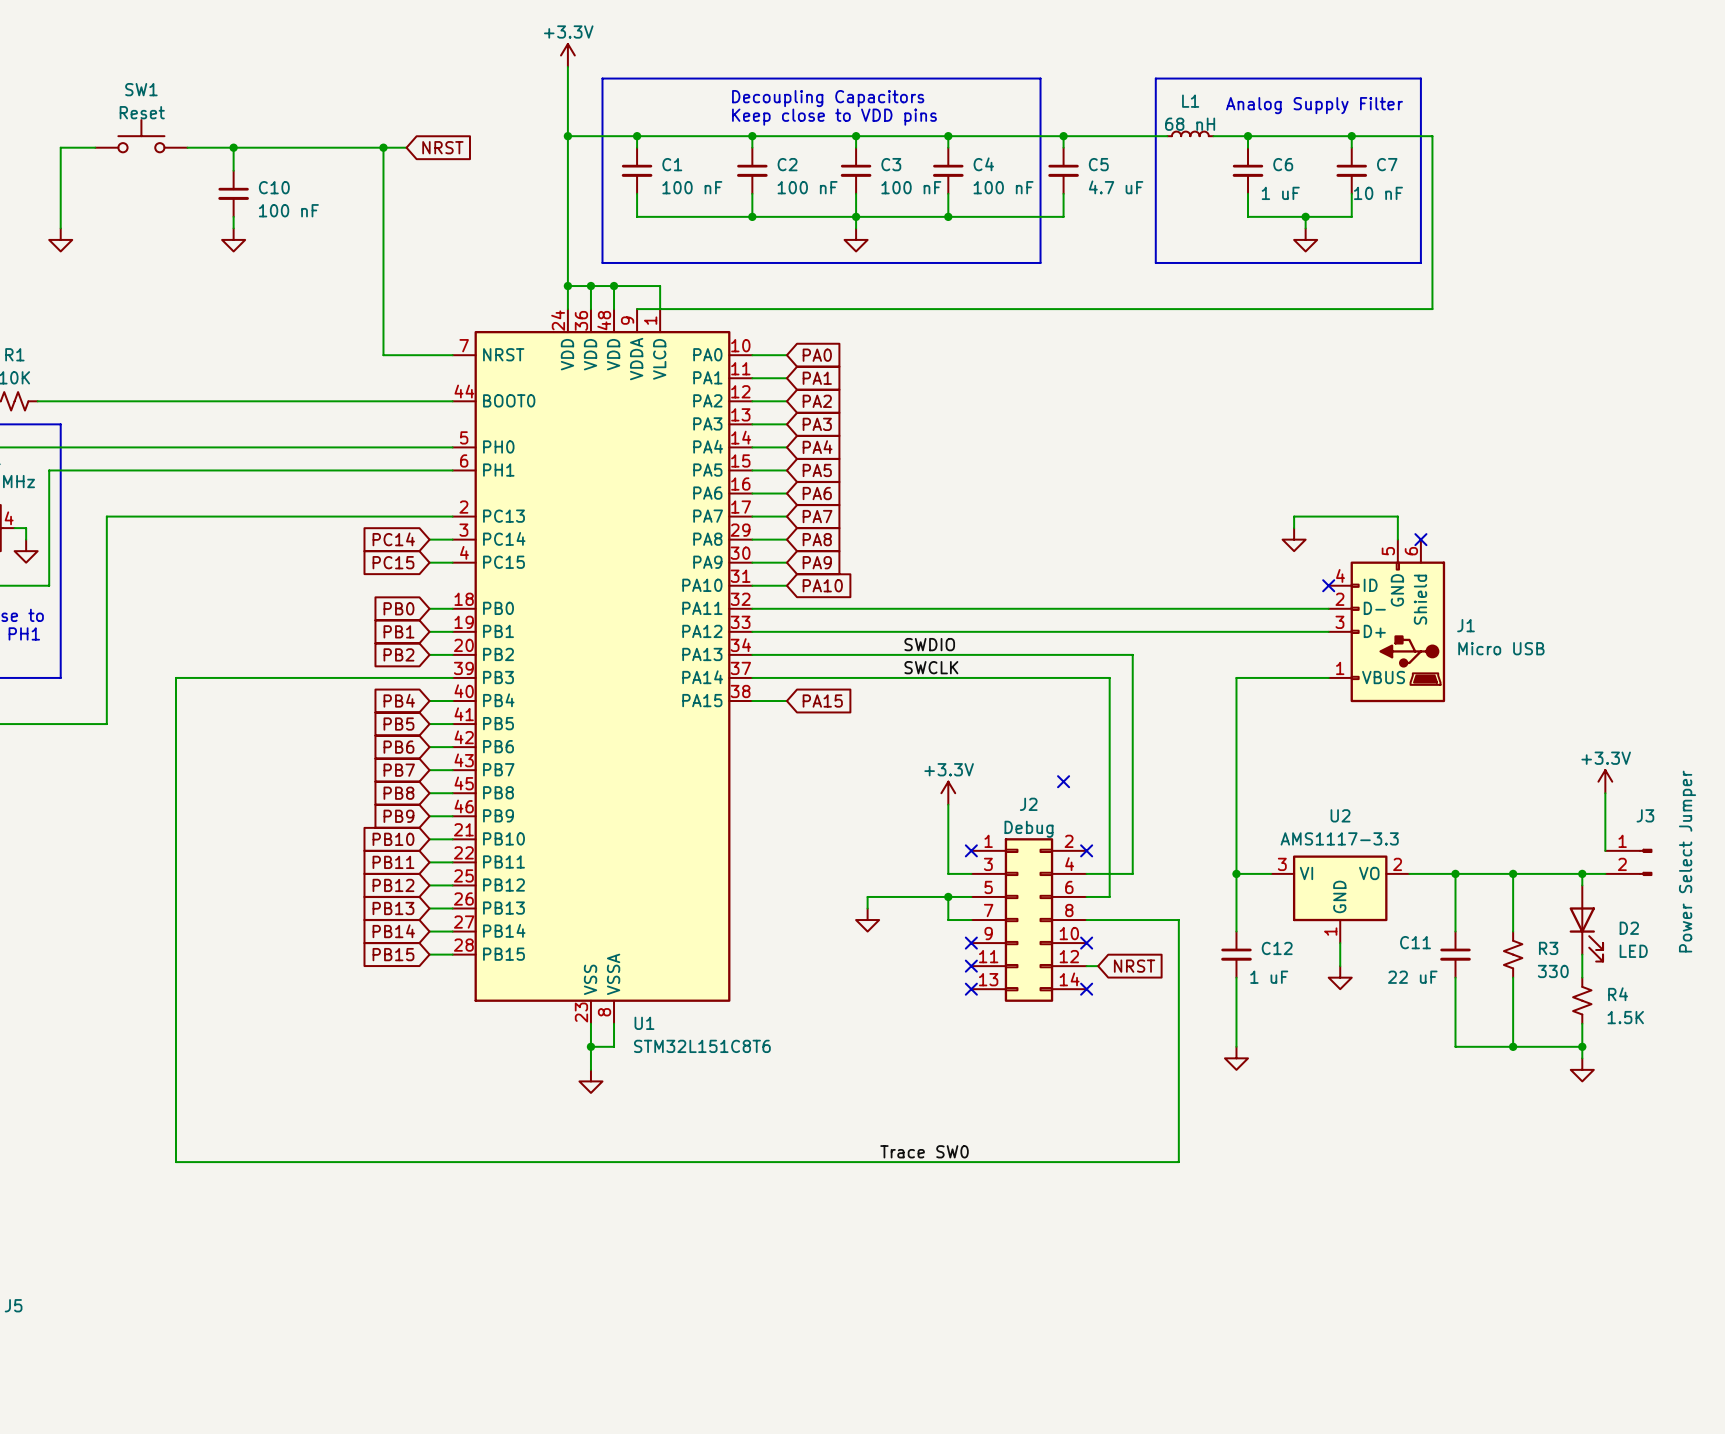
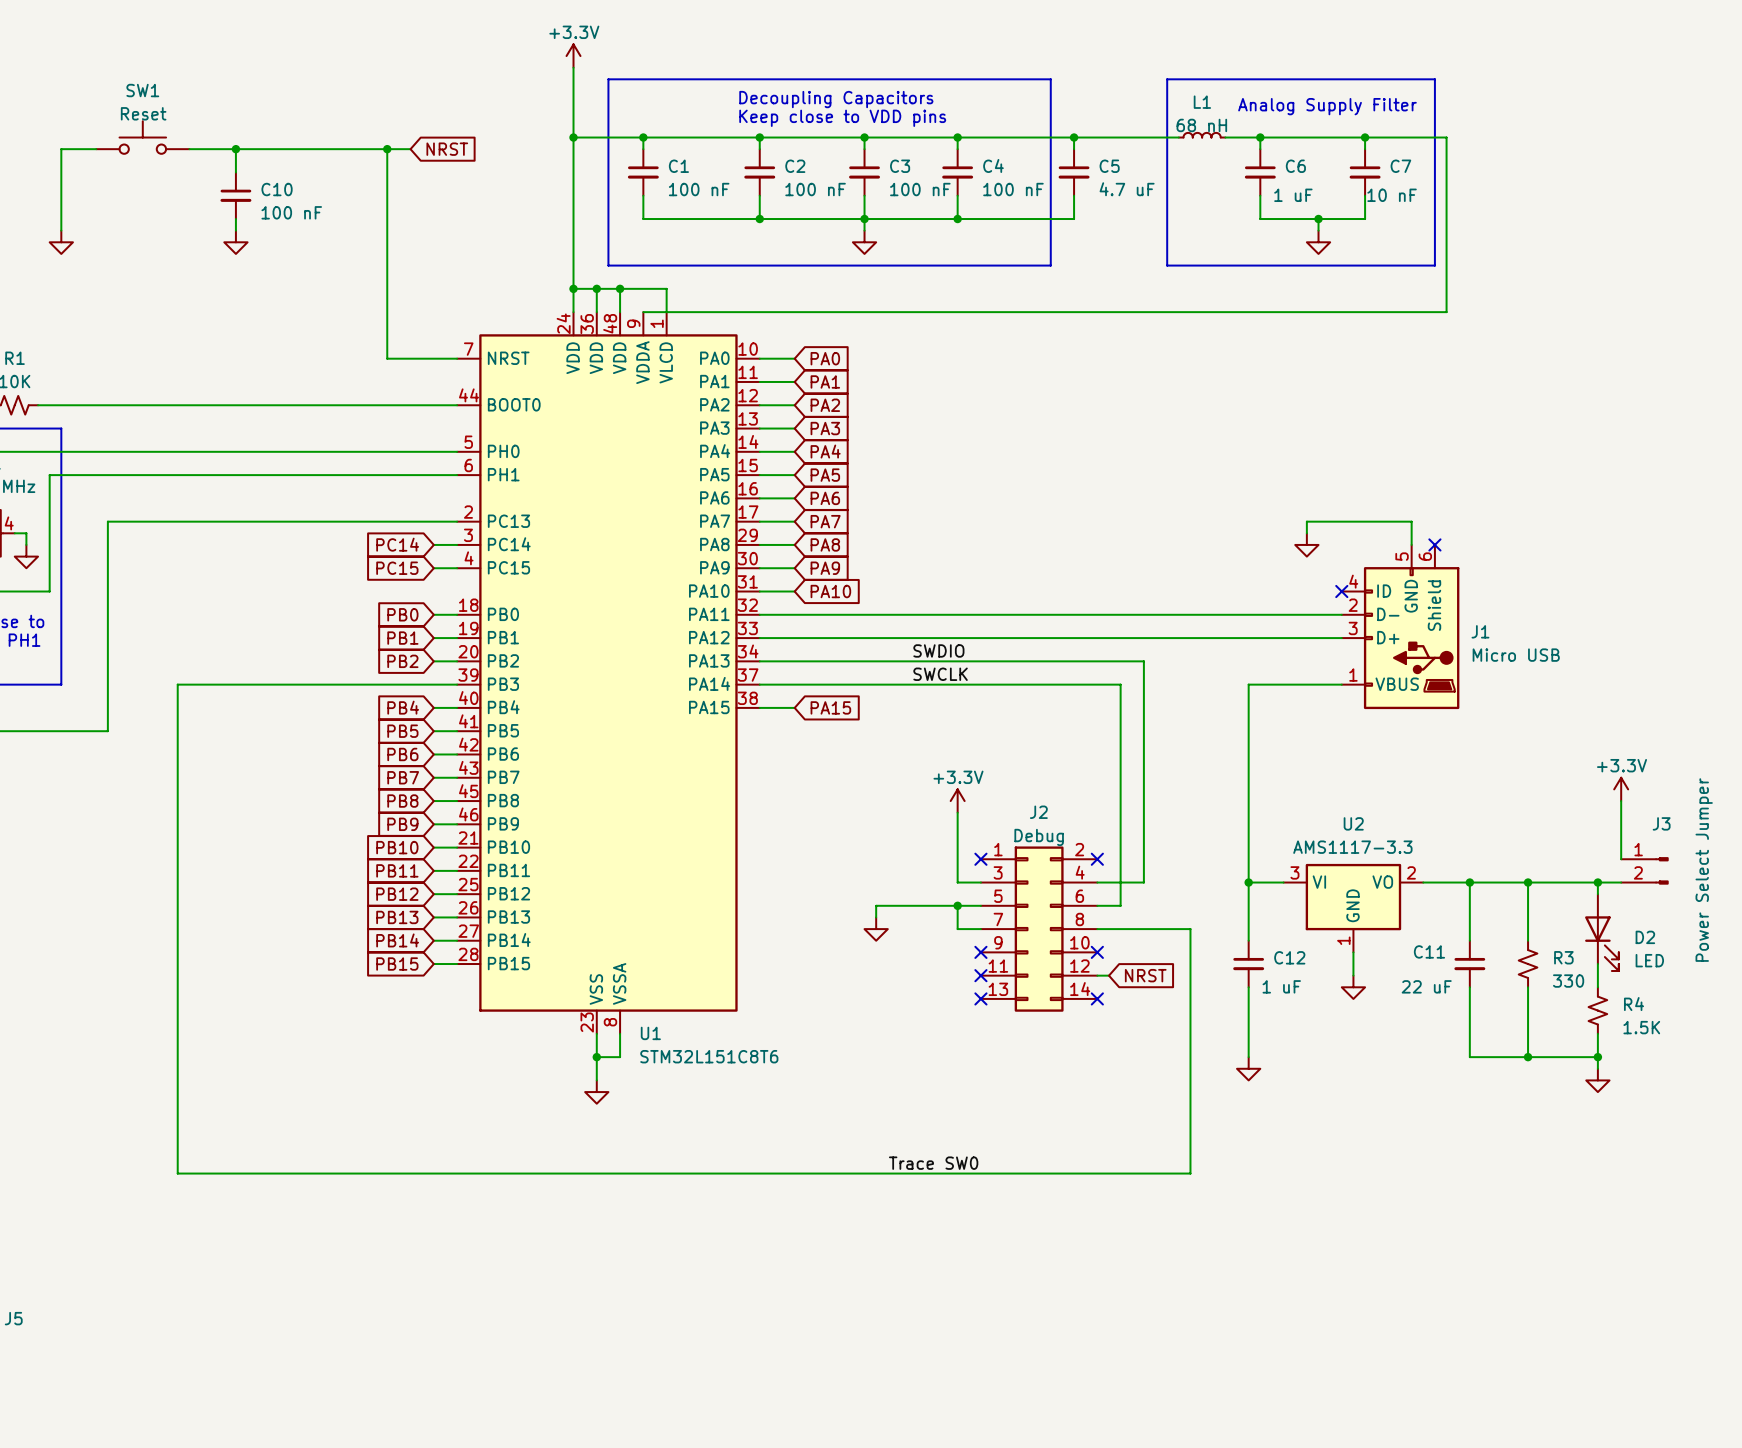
no-connect mark: (1063, 781) -> none

